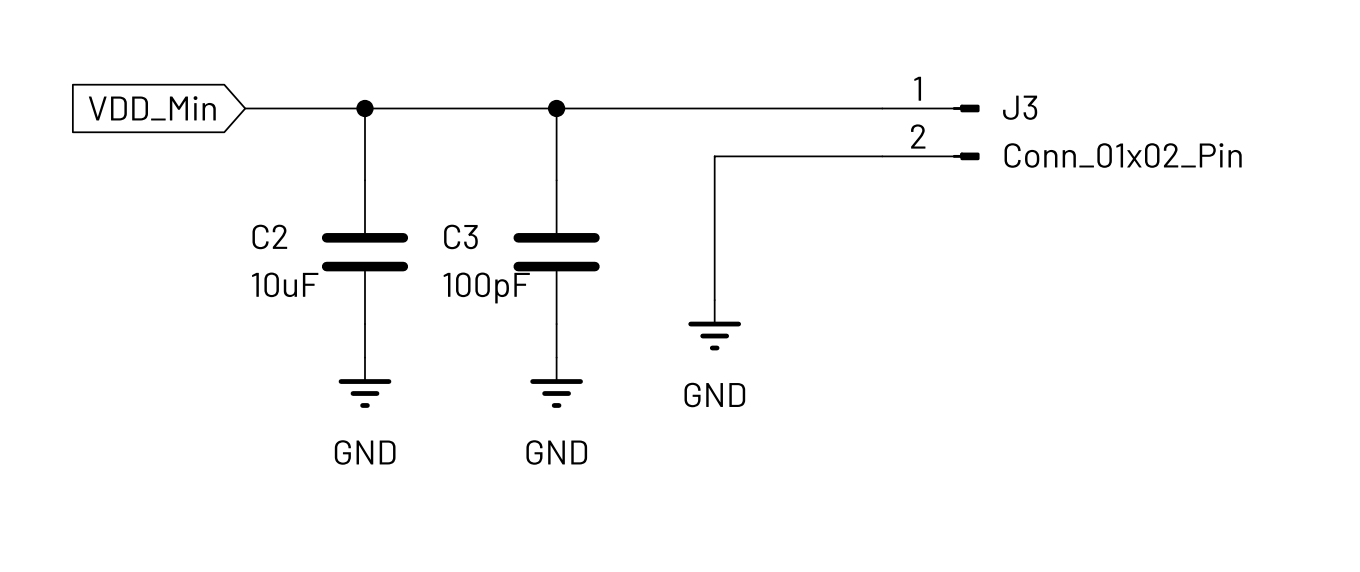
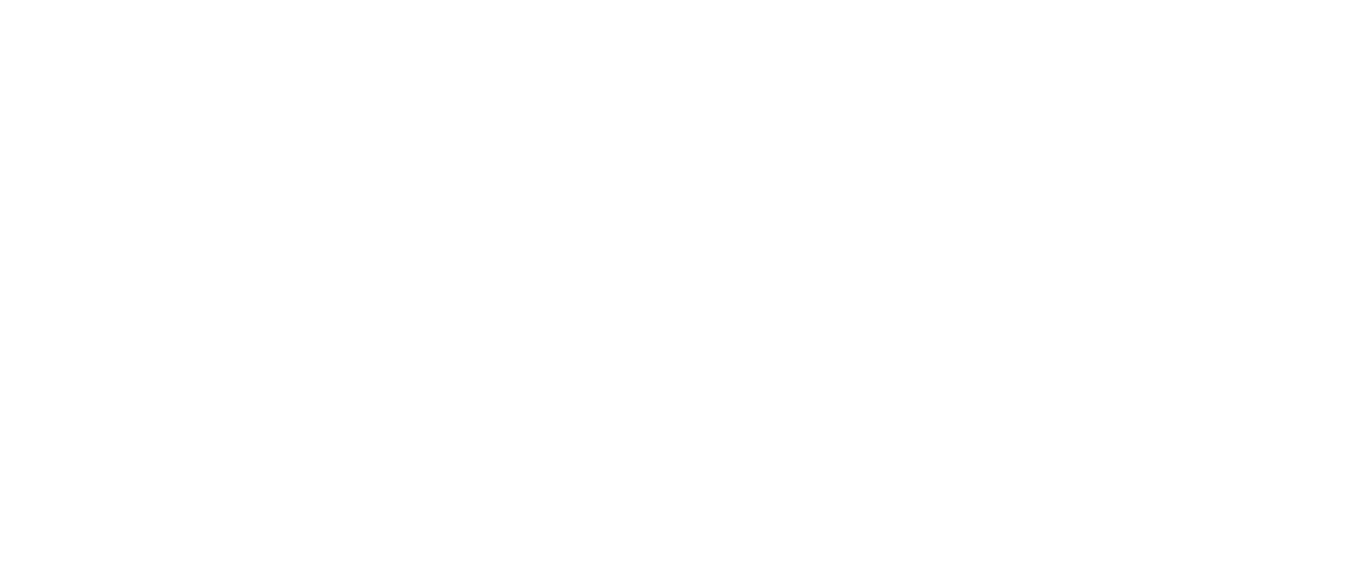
global label: VDD_Min (152, 108) -> none
wire: (245, 108) (882, 108) -> none
wire: (364, 108) (364, 180) -> none
junction: (364, 108) -> none
wire: (556, 108) (556, 180) -> none
junction: (556, 108) -> none
J3: Conn_01x02_Pin (930, 132) -> none
wire: (882, 156) (714, 156) (714, 300) -> none
C2: 10uF (364, 252) -> none
C3: 100pF (556, 252) -> none
wire: (364, 324) (364, 357) -> none
wire: (556, 324) (556, 357) -> none
power symbol: GND (714, 325) -> none
power symbol: GND (364, 382) -> none
power symbol: GND (556, 382) -> none

